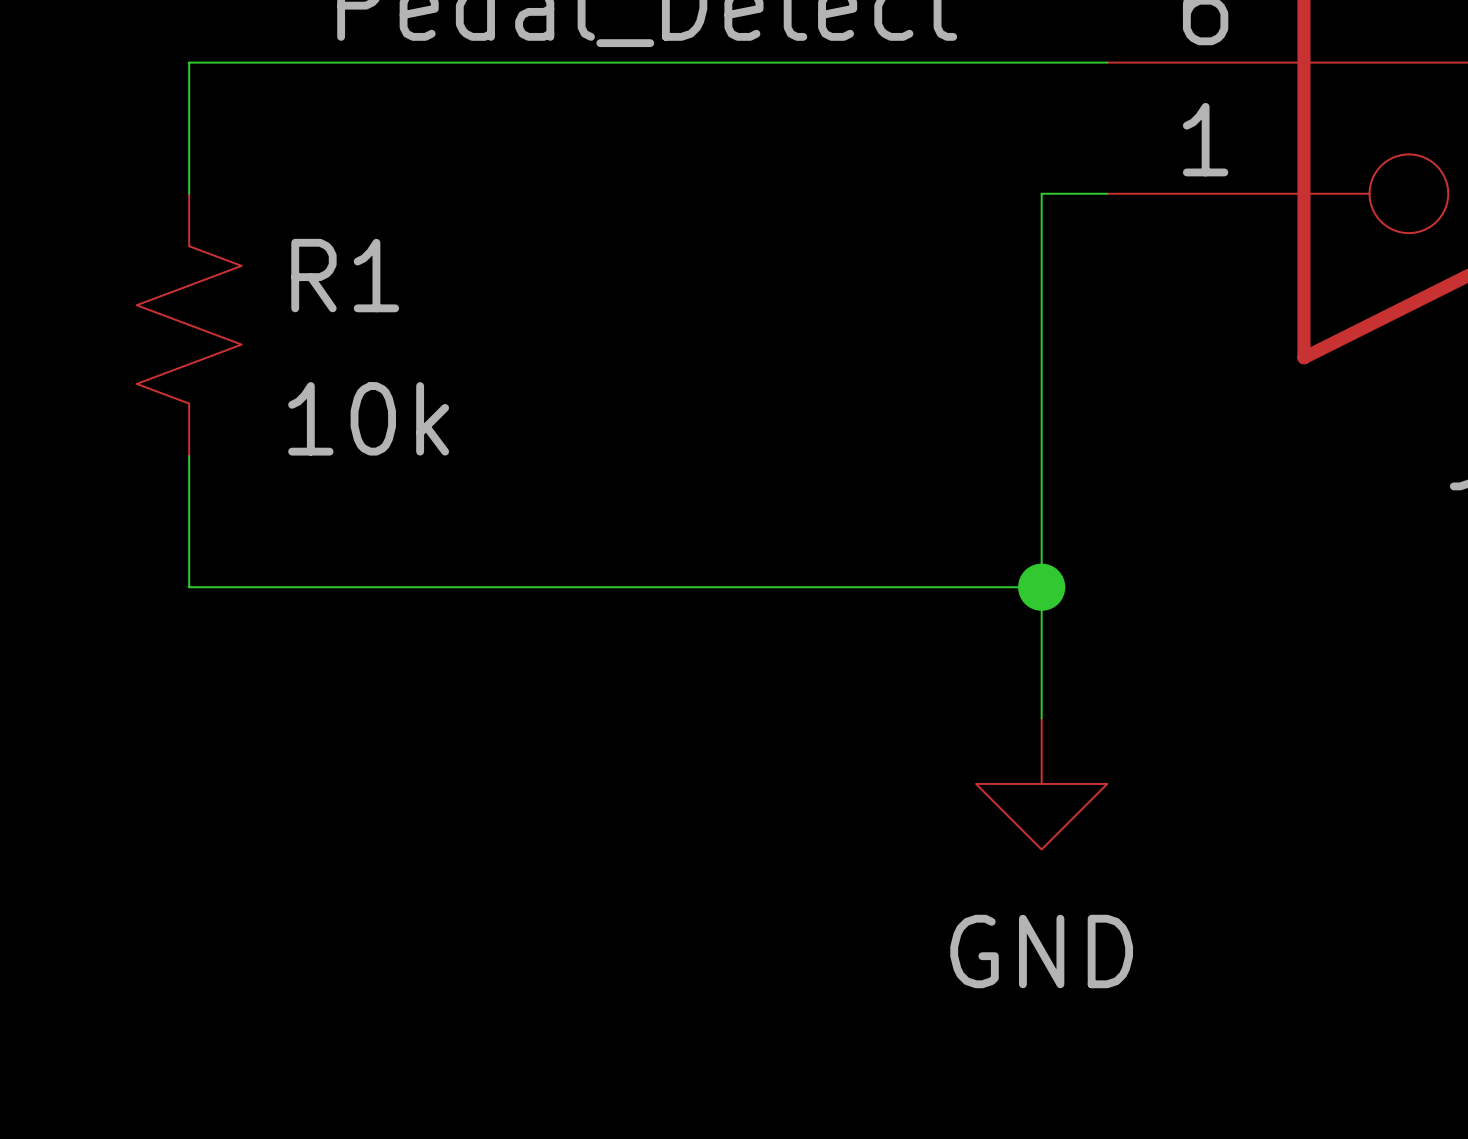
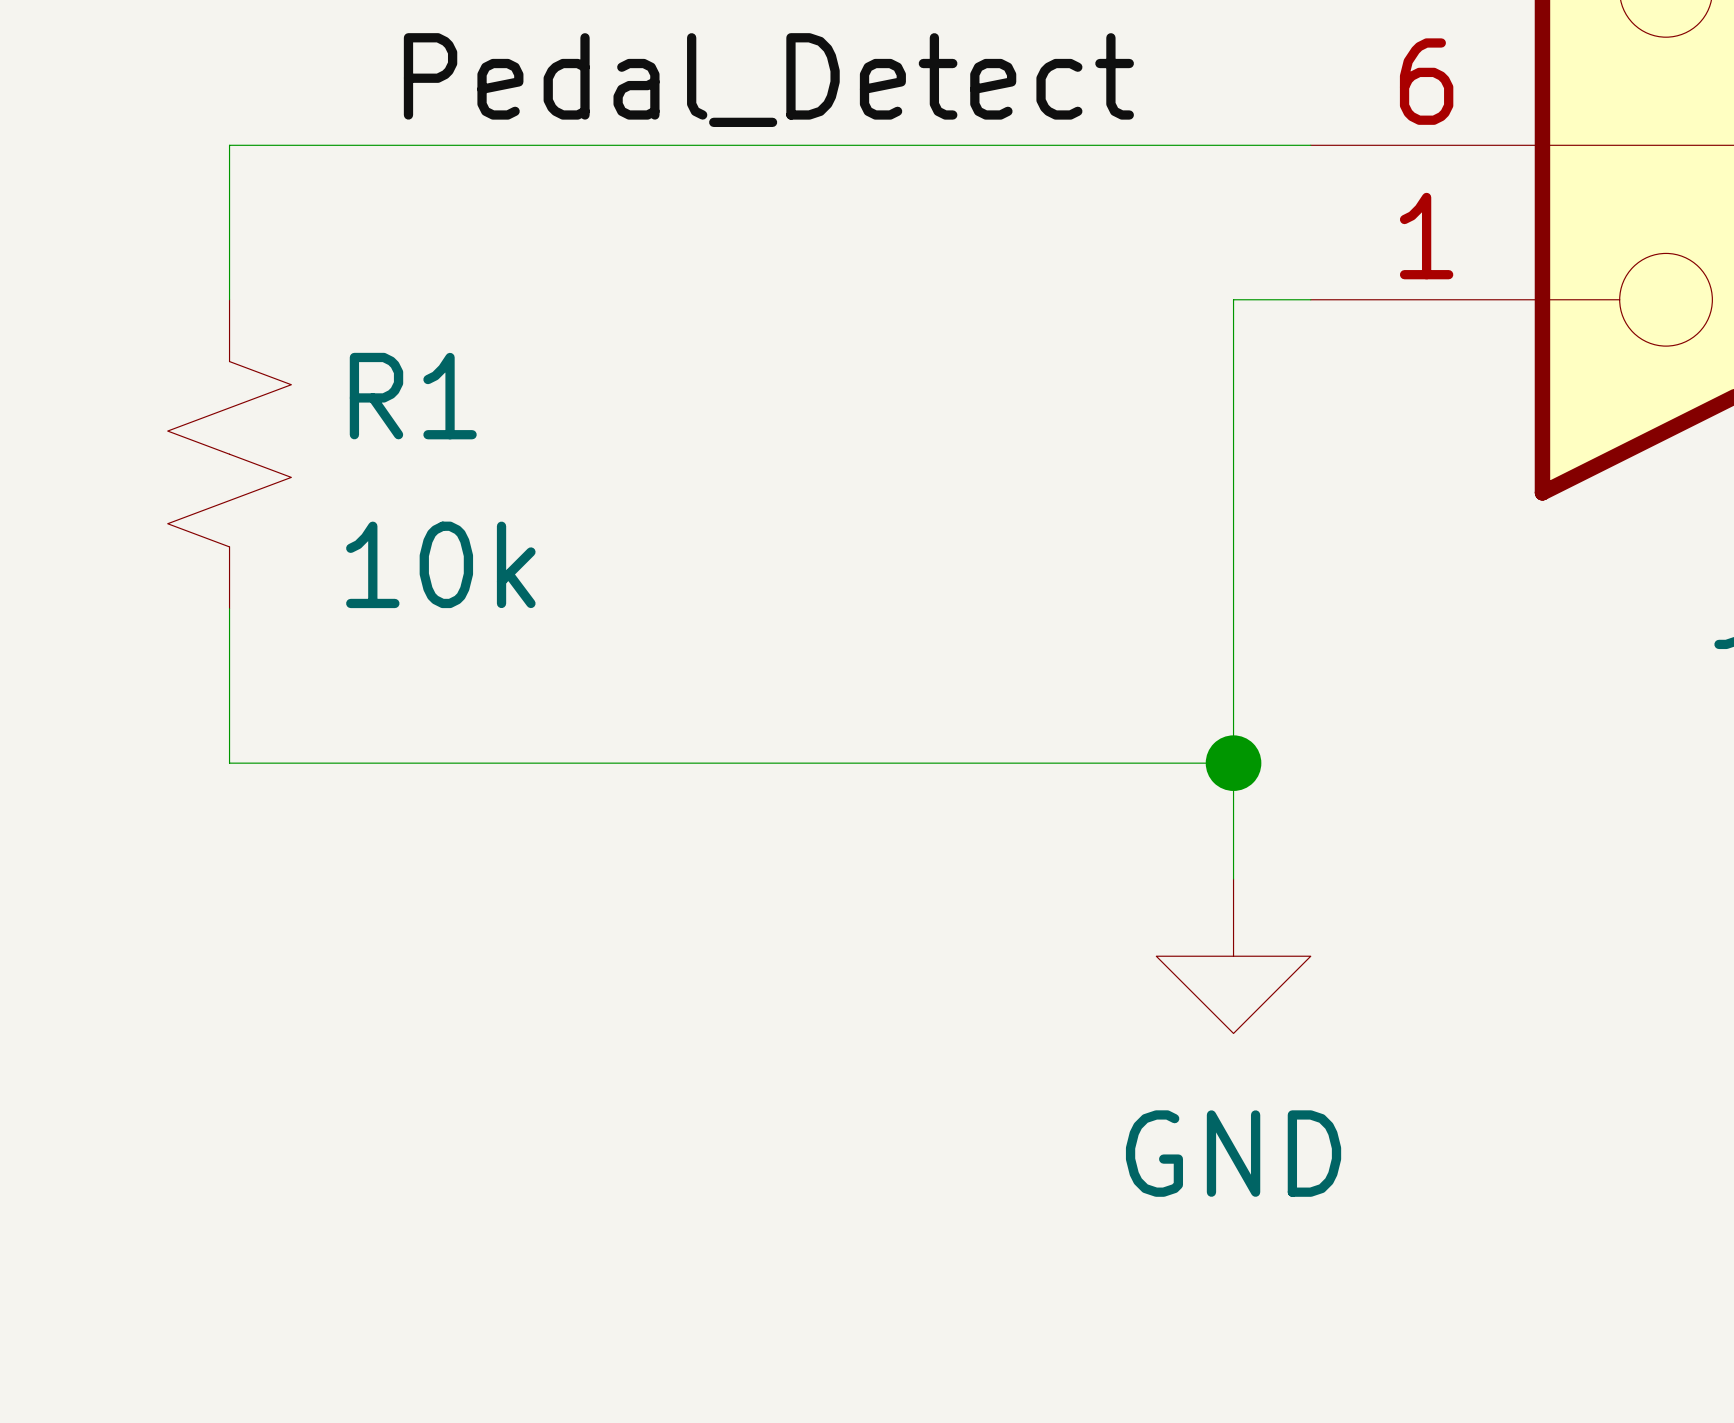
power symbol position: GND (1041, 783) -> GND (1233, 956)

